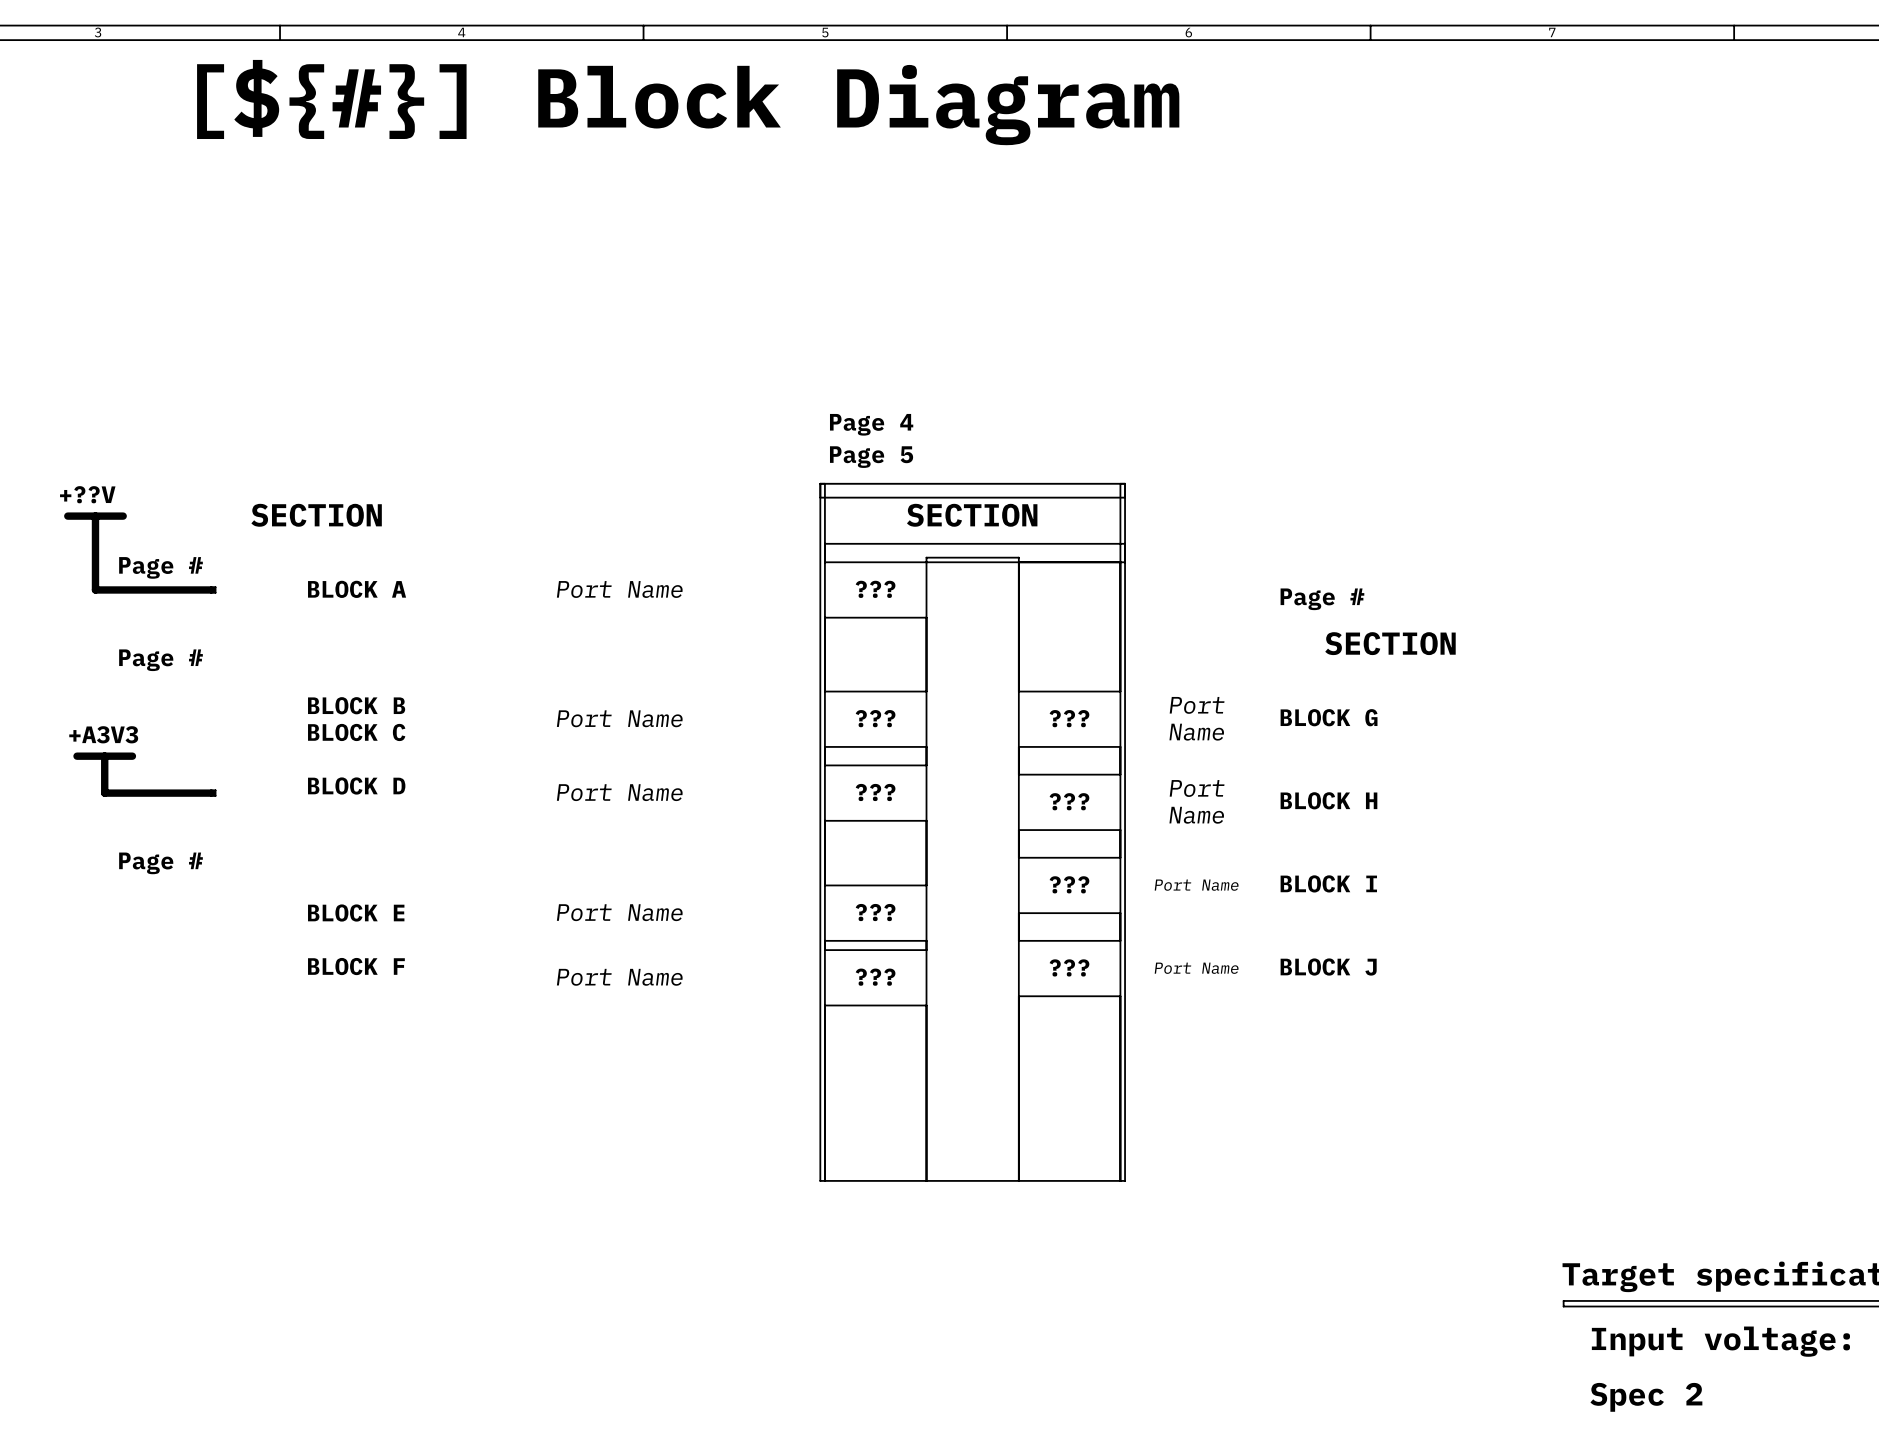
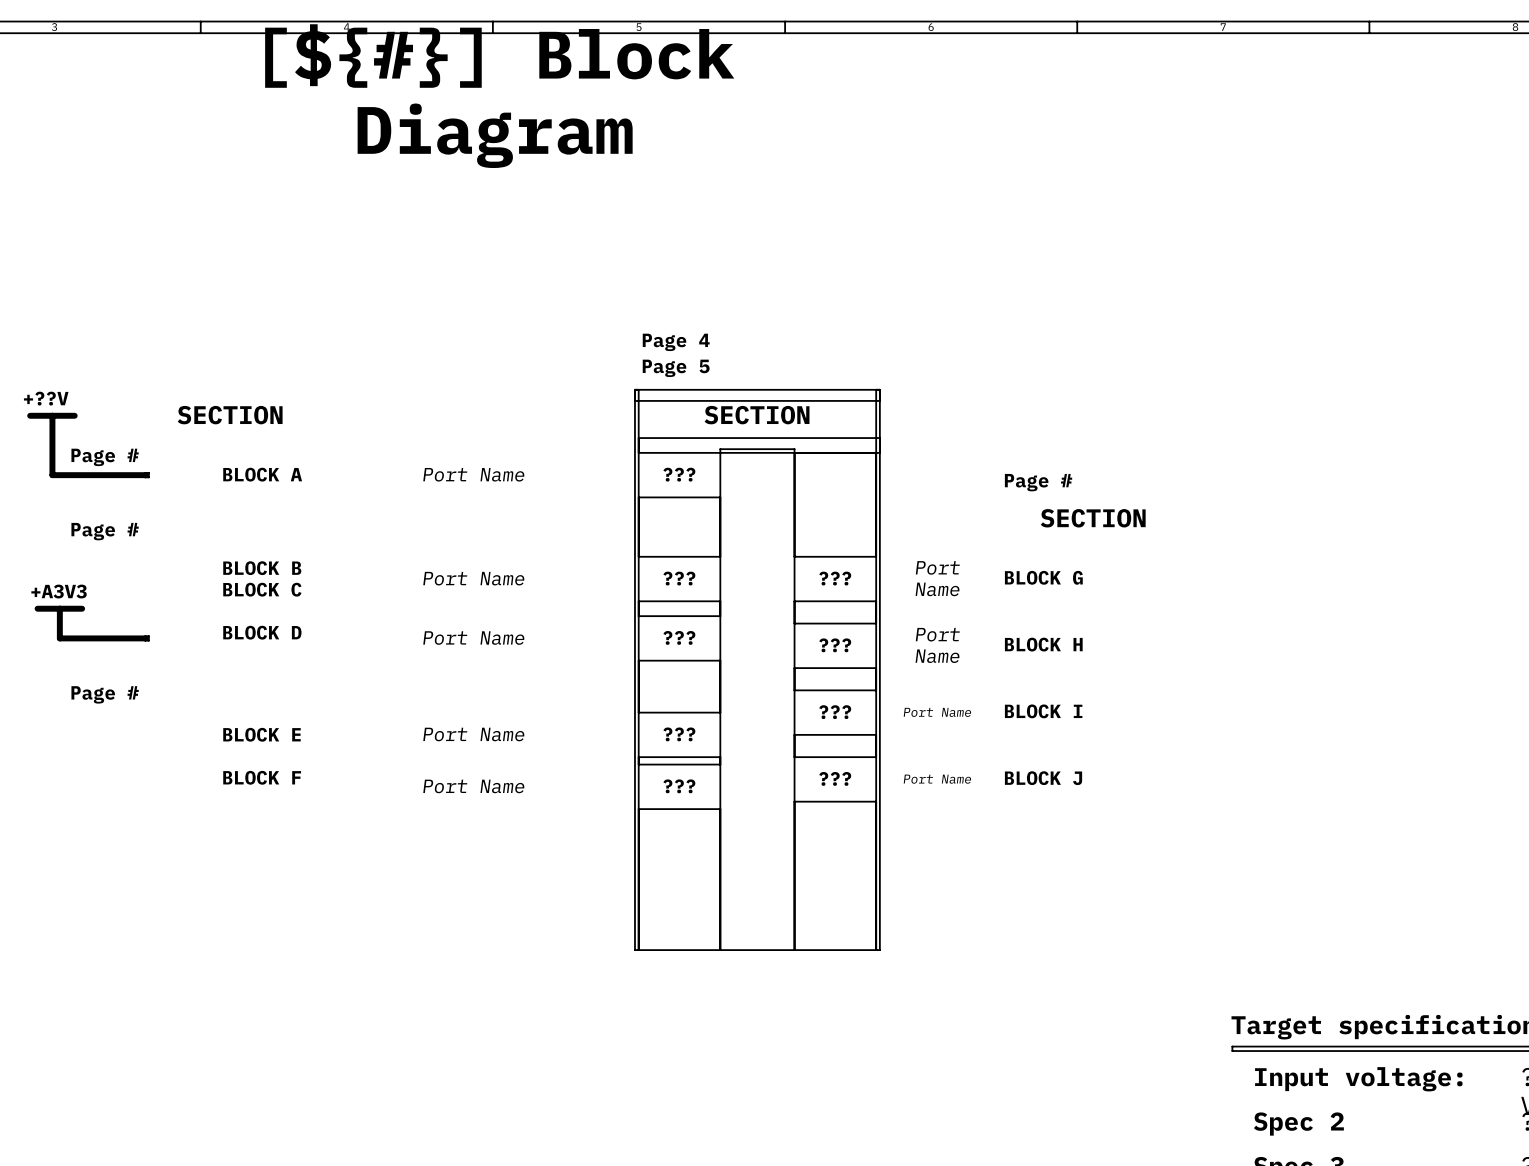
text: [${#}] Block Diagram (688, 102) -> [${#}] Block (499, 56)
text: none -> Diagram (495, 135)

